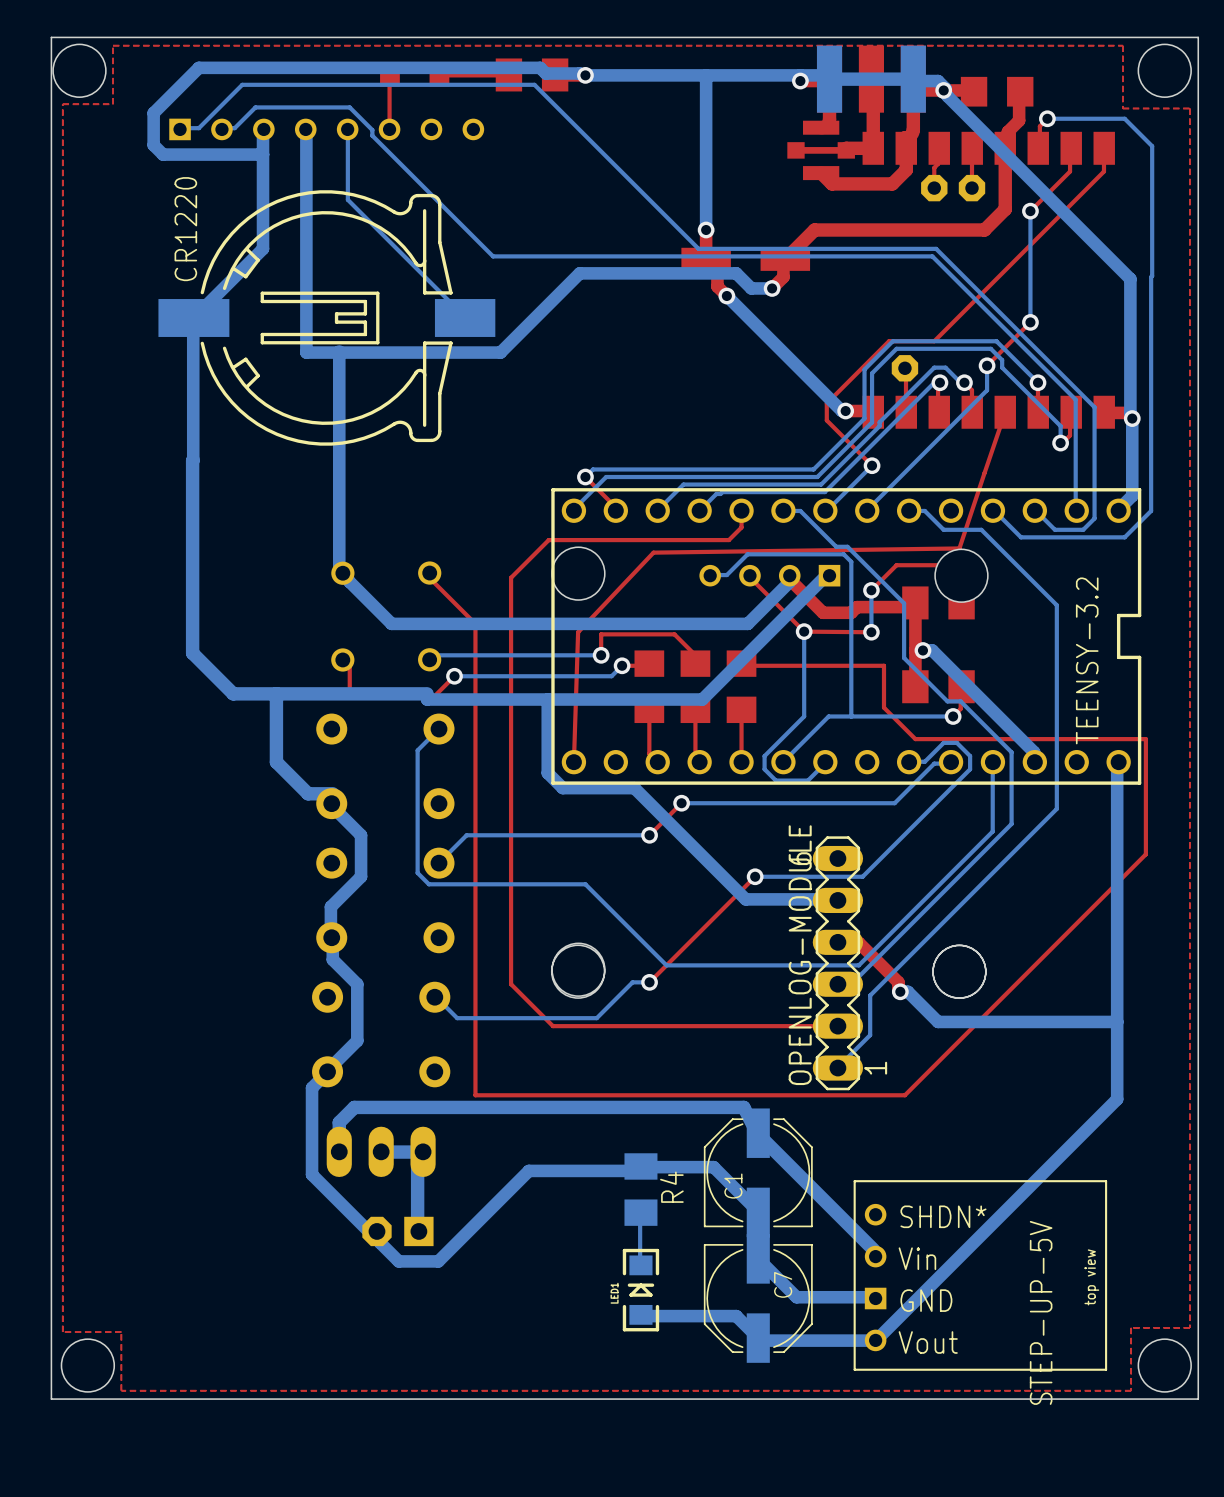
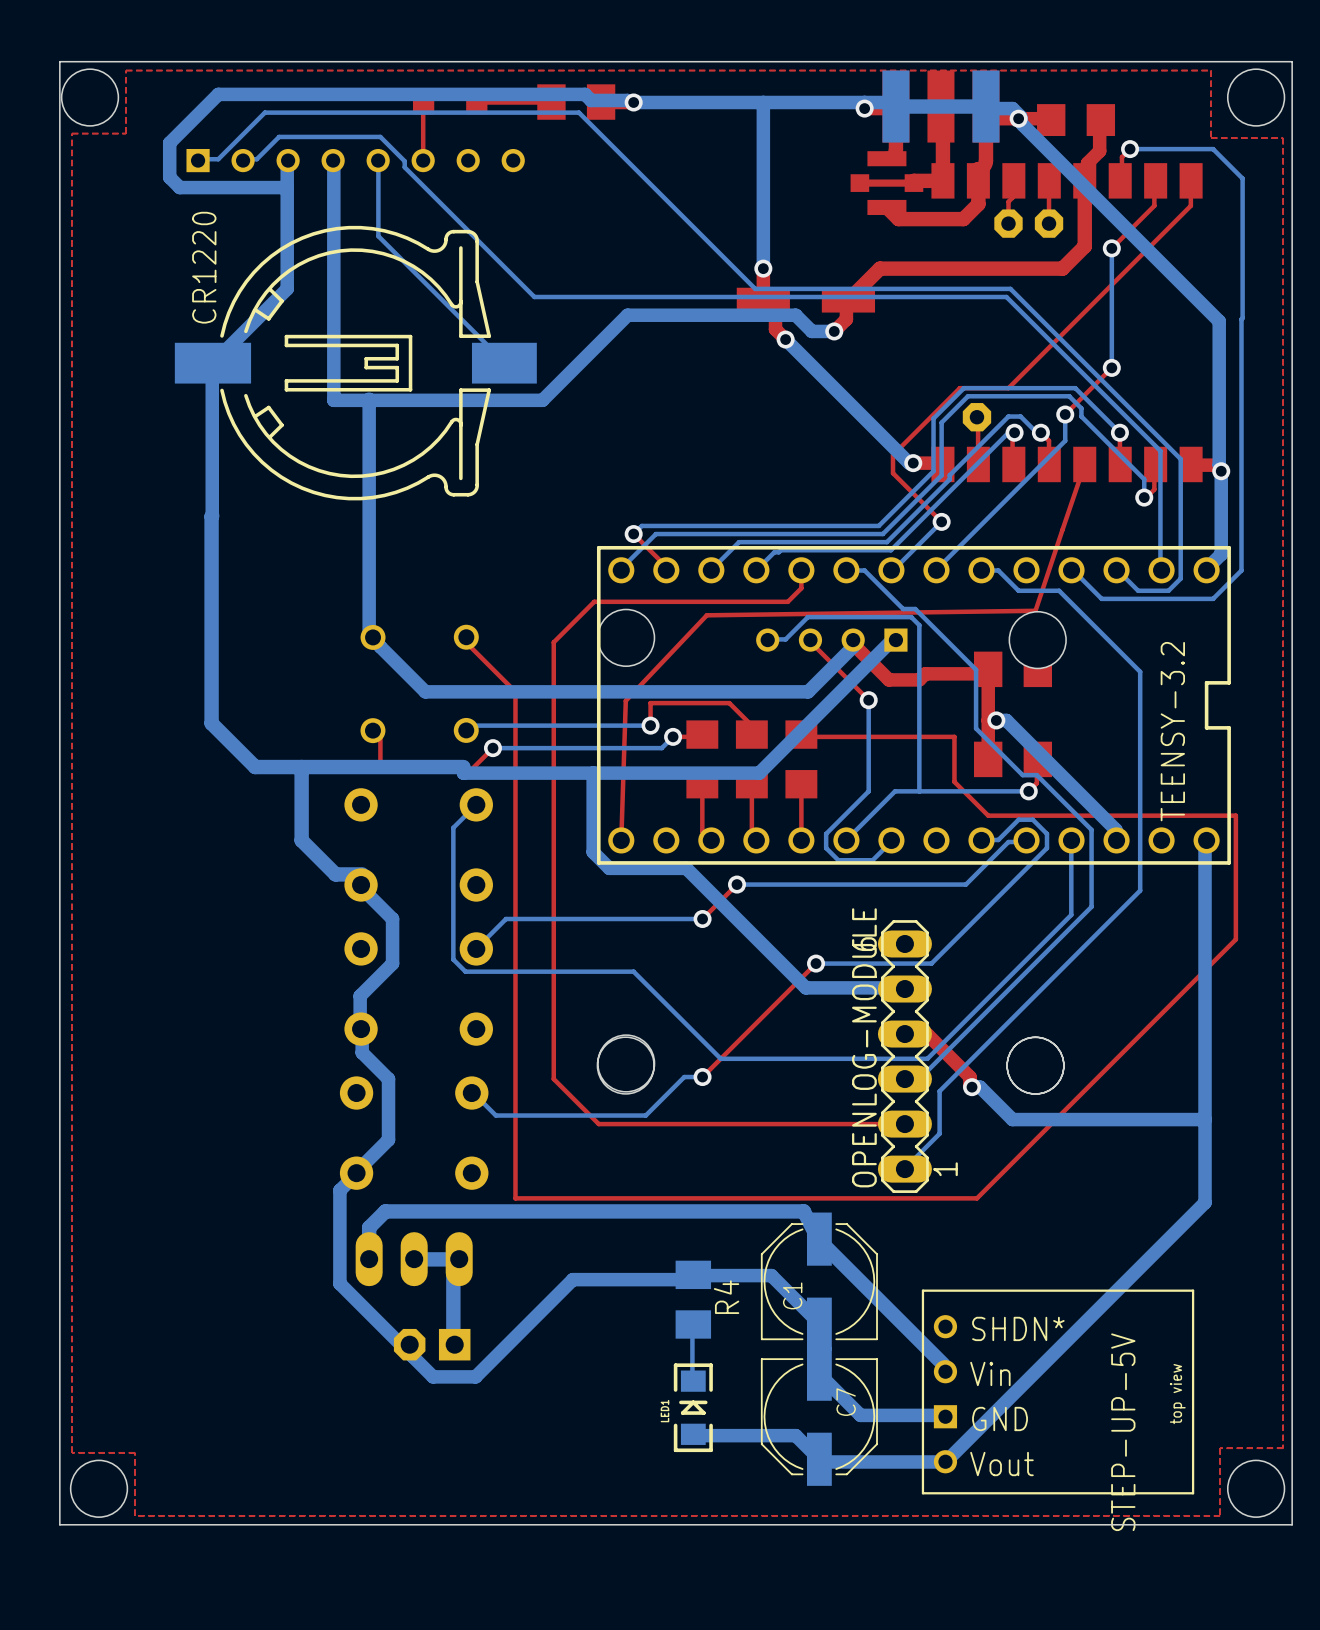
top track: (871, 590) (896, 565) (946, 565) (959, 577) (959, 600) (961, 602) -> none
bottom track: (871, 590) (871, 632) -> none
via: (871, 590) -> none
top track: (804, 631) (871, 632) -> none
via: (871, 632) -> none

